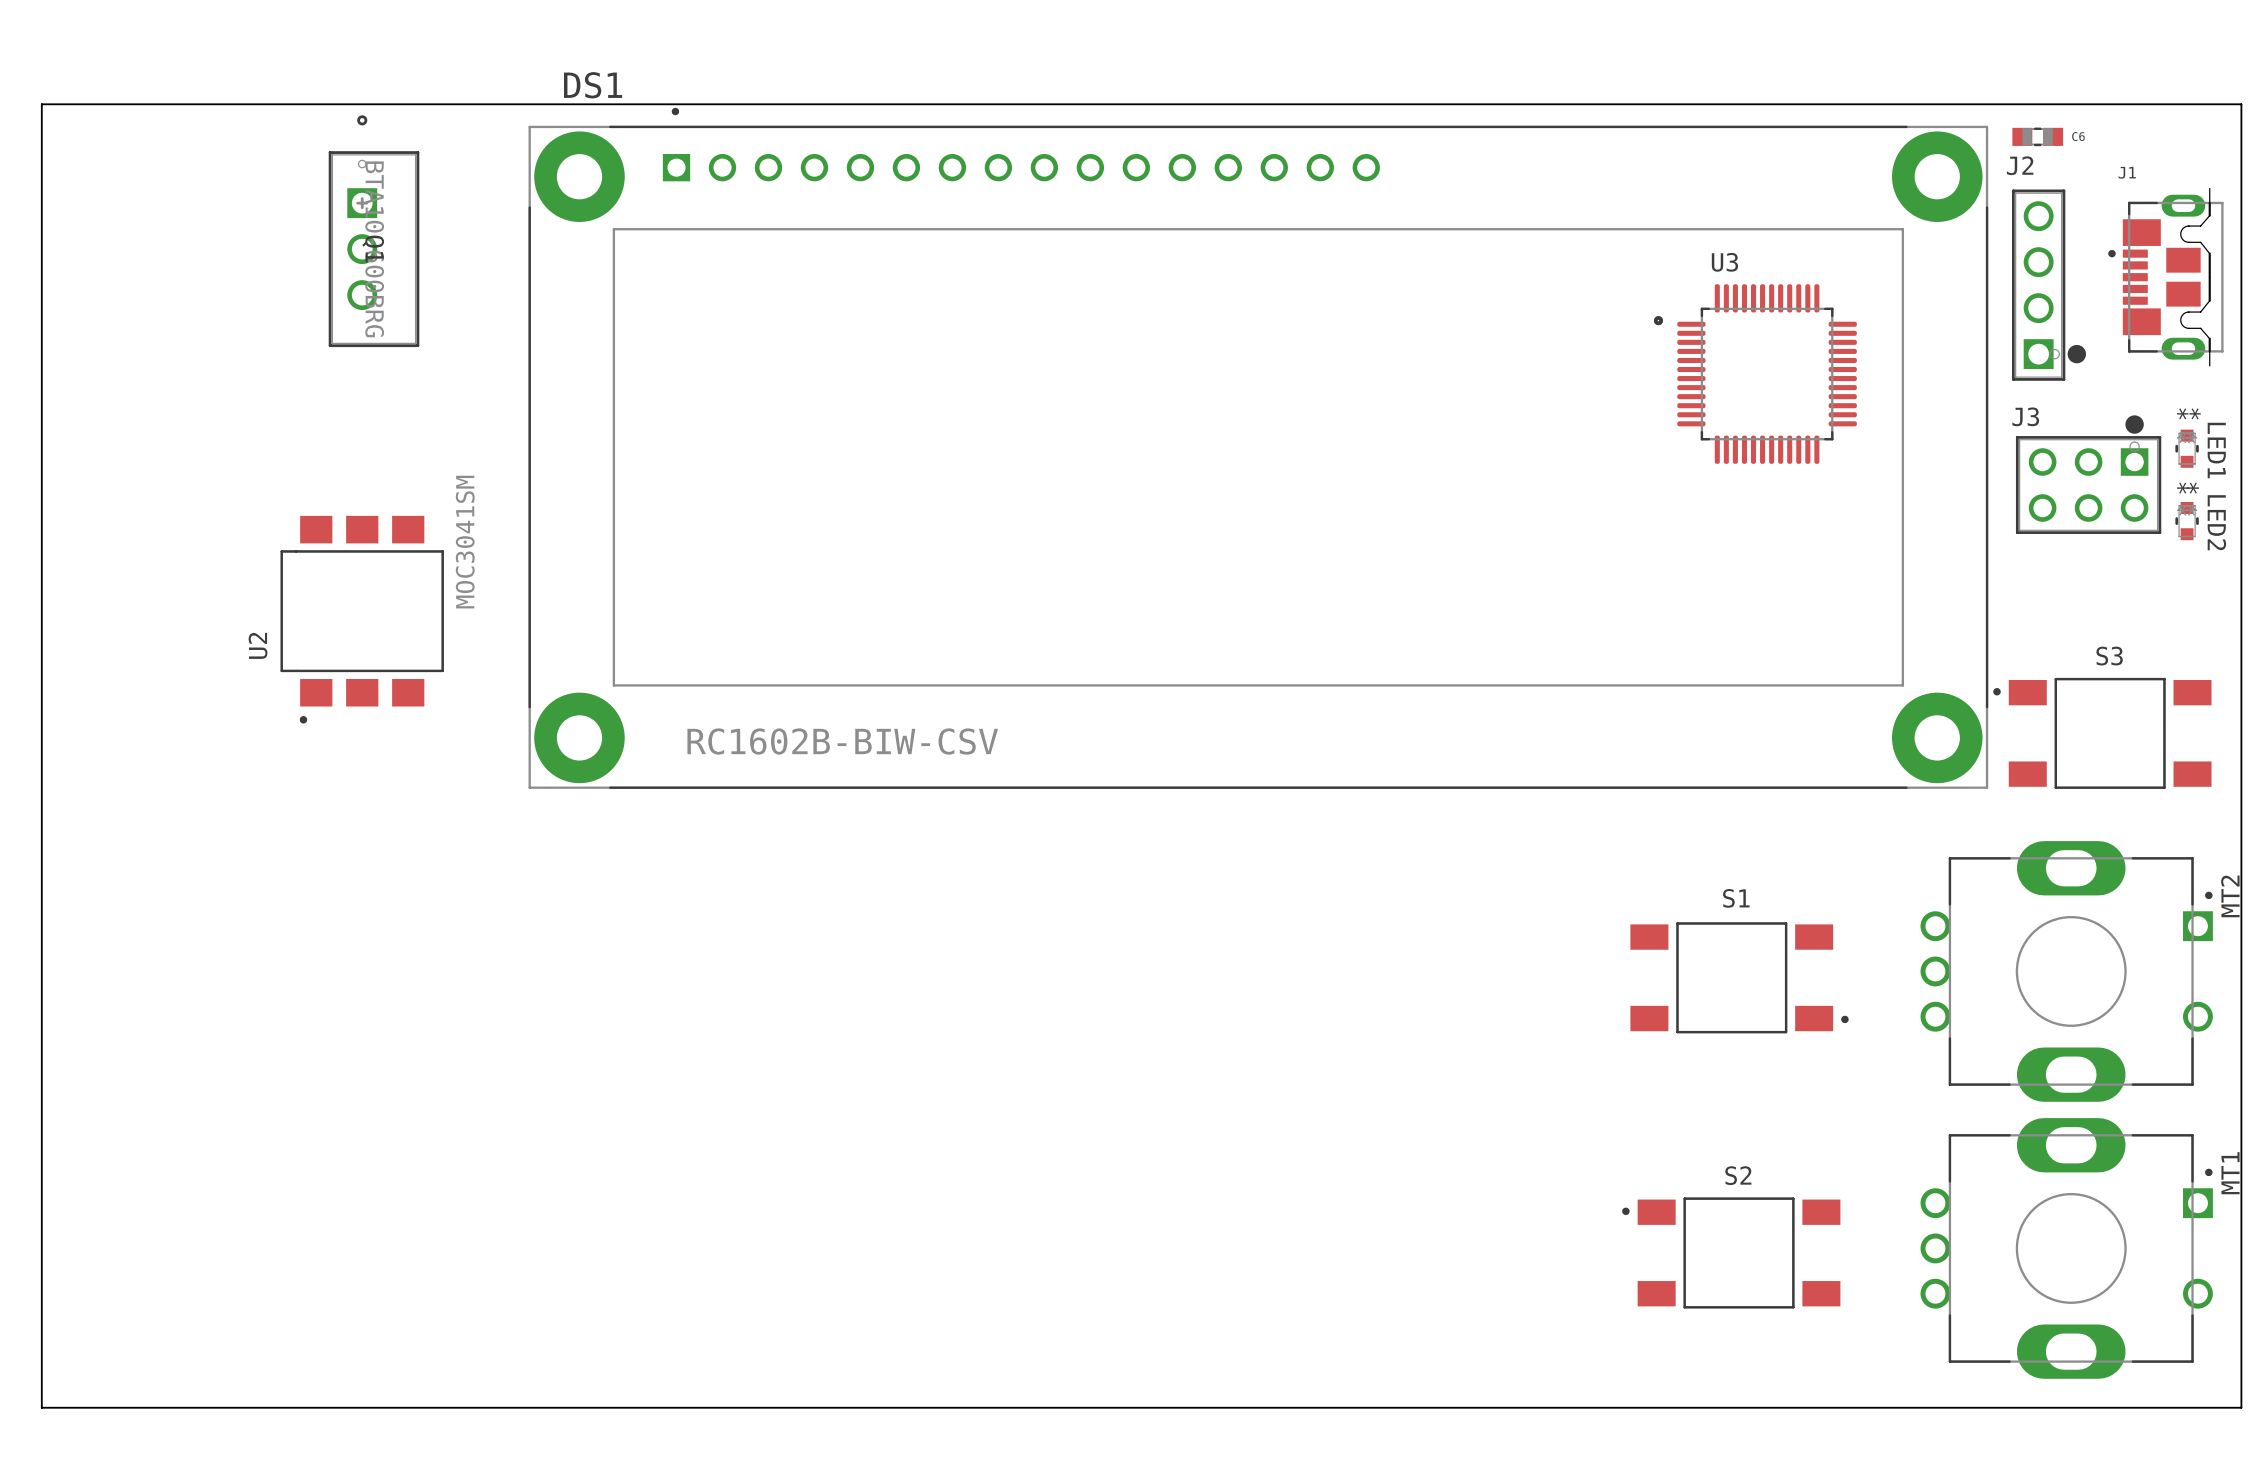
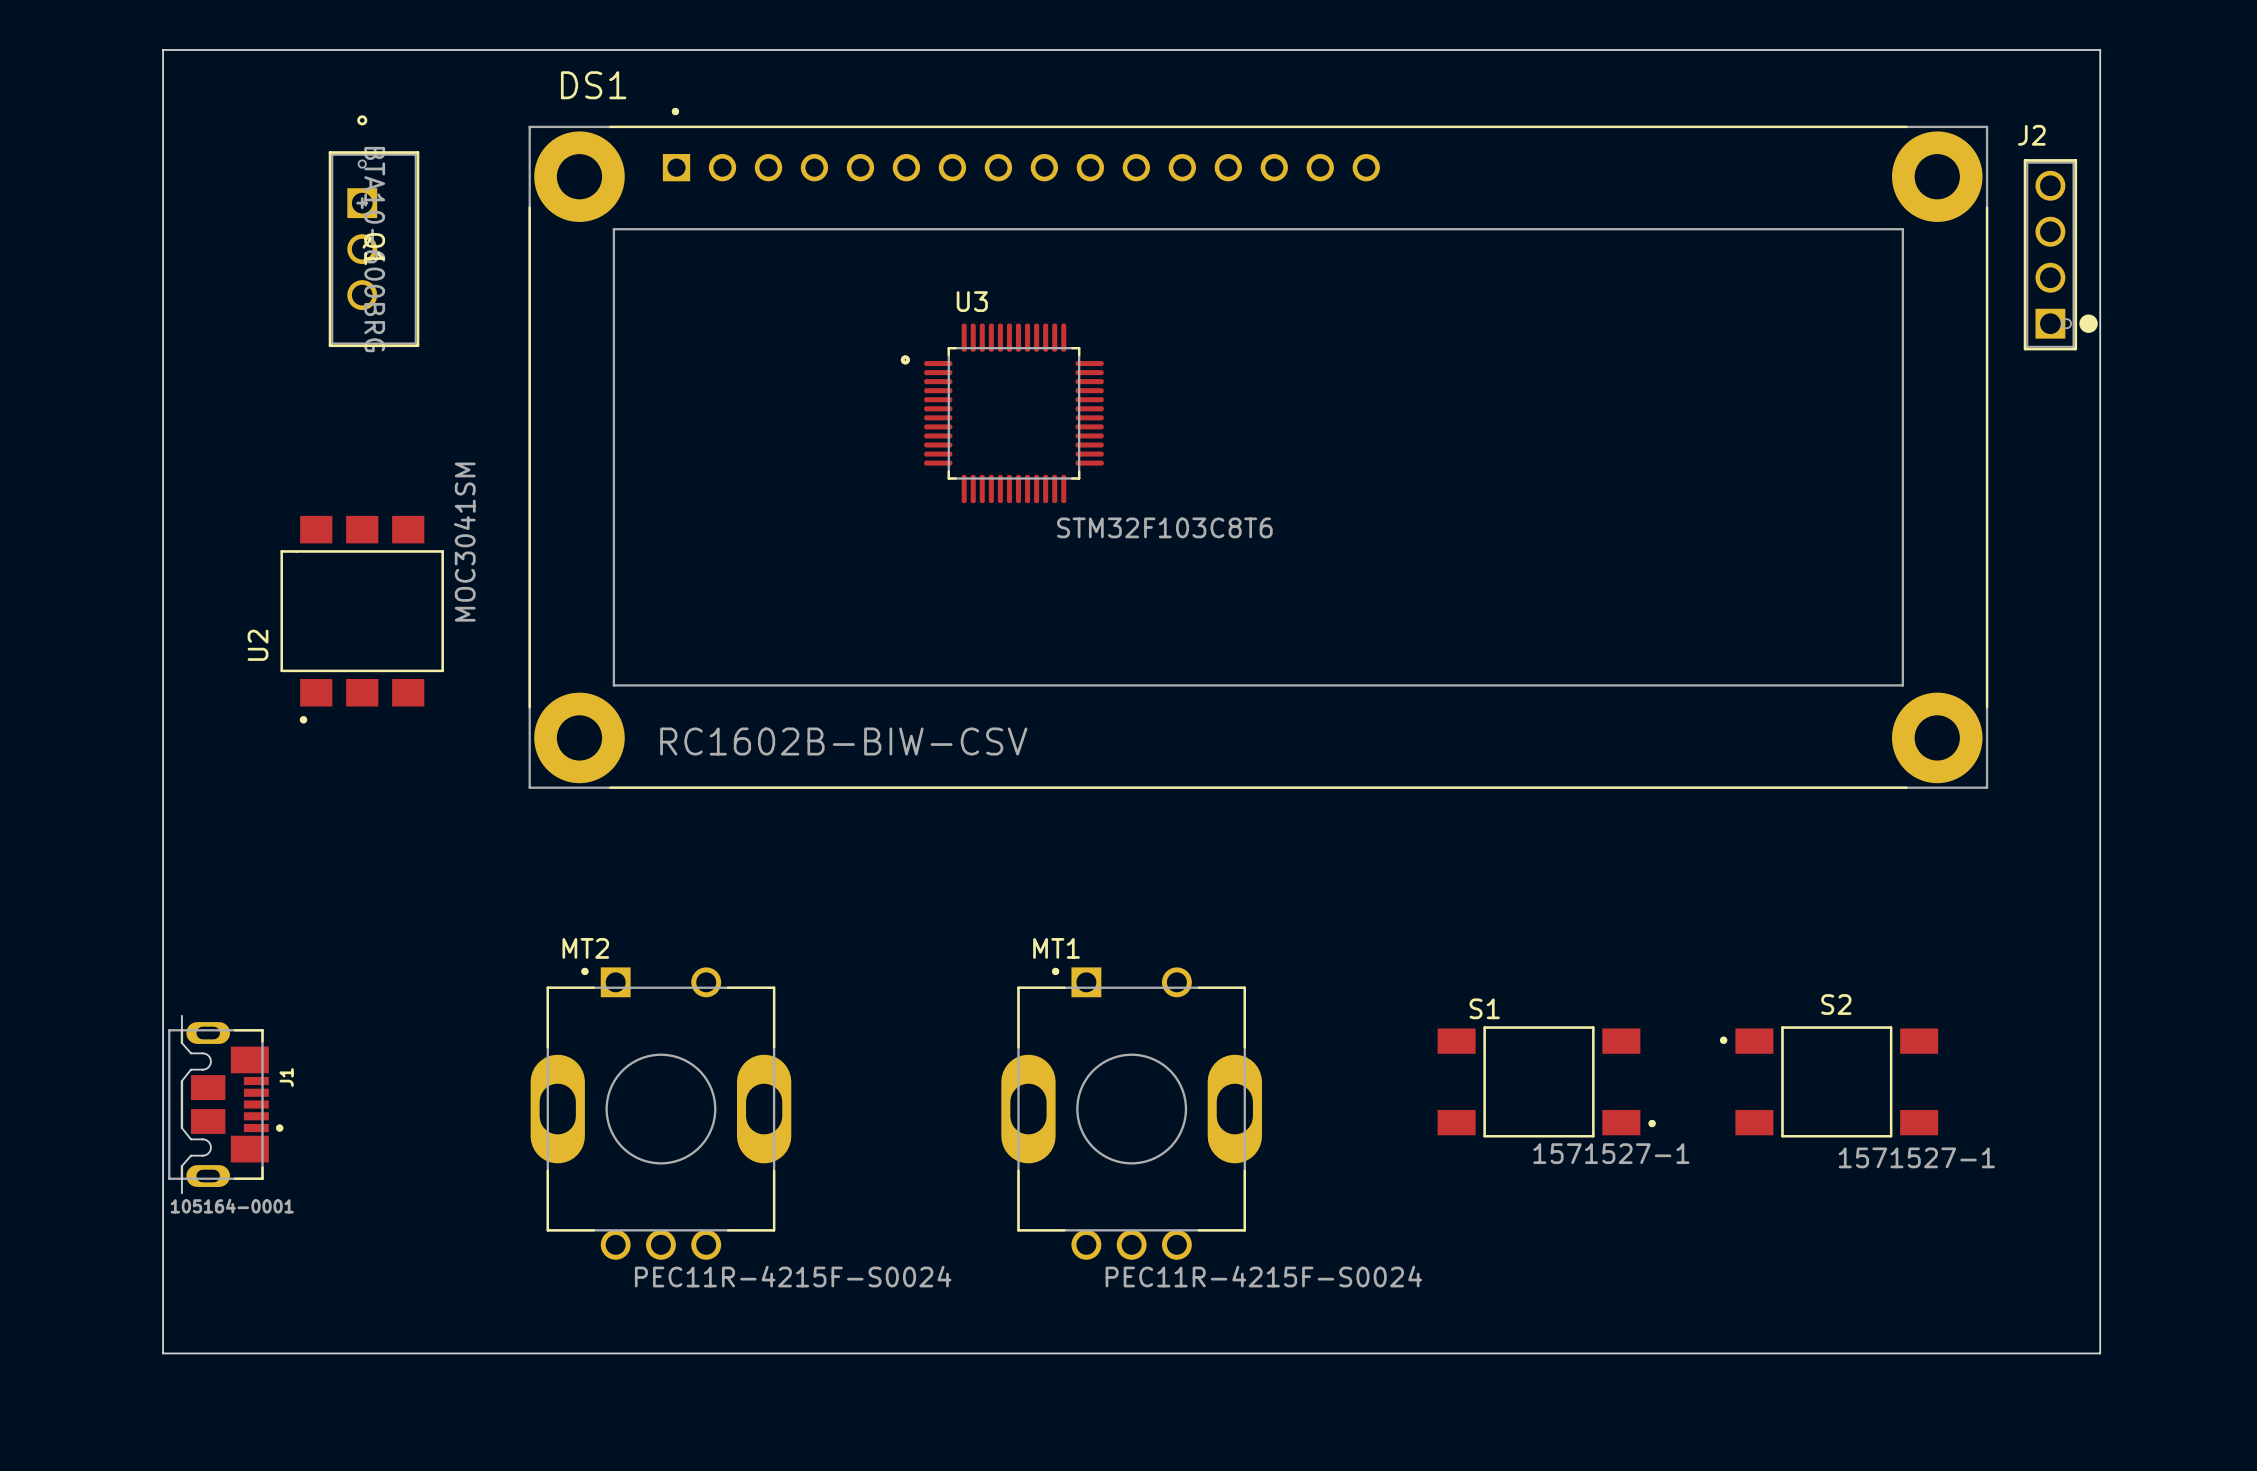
board edge: (41, 104) (2241, 104) (2241, 1407) (41, 1407) (41, 104) -> (163, 49) (163, 1353) (2100, 1353) (2100, 49) (163, 49)
C6: (2037, 136) -> none
J1 name position: J1 (2127, 172) -> J1 (286, 1077)
J1 rotation: 0° (2165, 277) -> 180° (225, 1104)
J1 position: (2165, 277) -> (225, 1104)
J2 position: (2048, 285) -> (2060, 254)
U3 position: (1755, 374) -> (1002, 413)
LED1: (2187, 448) -> none
J3: (2088, 474) -> none
LED2: (2187, 521) -> none
U3 value: none -> STM32F103C8T6 (1164, 527)
S3: (2102, 733) -> none
S1 name position: S1 (1736, 898) -> S1 (1484, 1008)
MT2 rotation: 0° (2066, 971) -> 90° counterclockwise (660, 1113)
MT2 position: (2066, 971) -> (660, 1113)
S1 position: (1739, 977) -> (1546, 1081)
S1 value: none -> 1571527-1 (1611, 1153)
S2 value: none -> 1571527-1 (1916, 1157)
J1 value: none -> 105164-0001 (232, 1206)
MT1 rotation: 0° (2066, 1248) -> 90° counterclockwise (1131, 1113)
MT1 position: (2066, 1248) -> (1131, 1113)
S2 position: (1731, 1252) -> (1829, 1081)
MT2 value: none -> PEC11R-4215F-S0024 (793, 1276)
MT1 value: none -> PEC11R-4215F-S0024 (1263, 1276)

